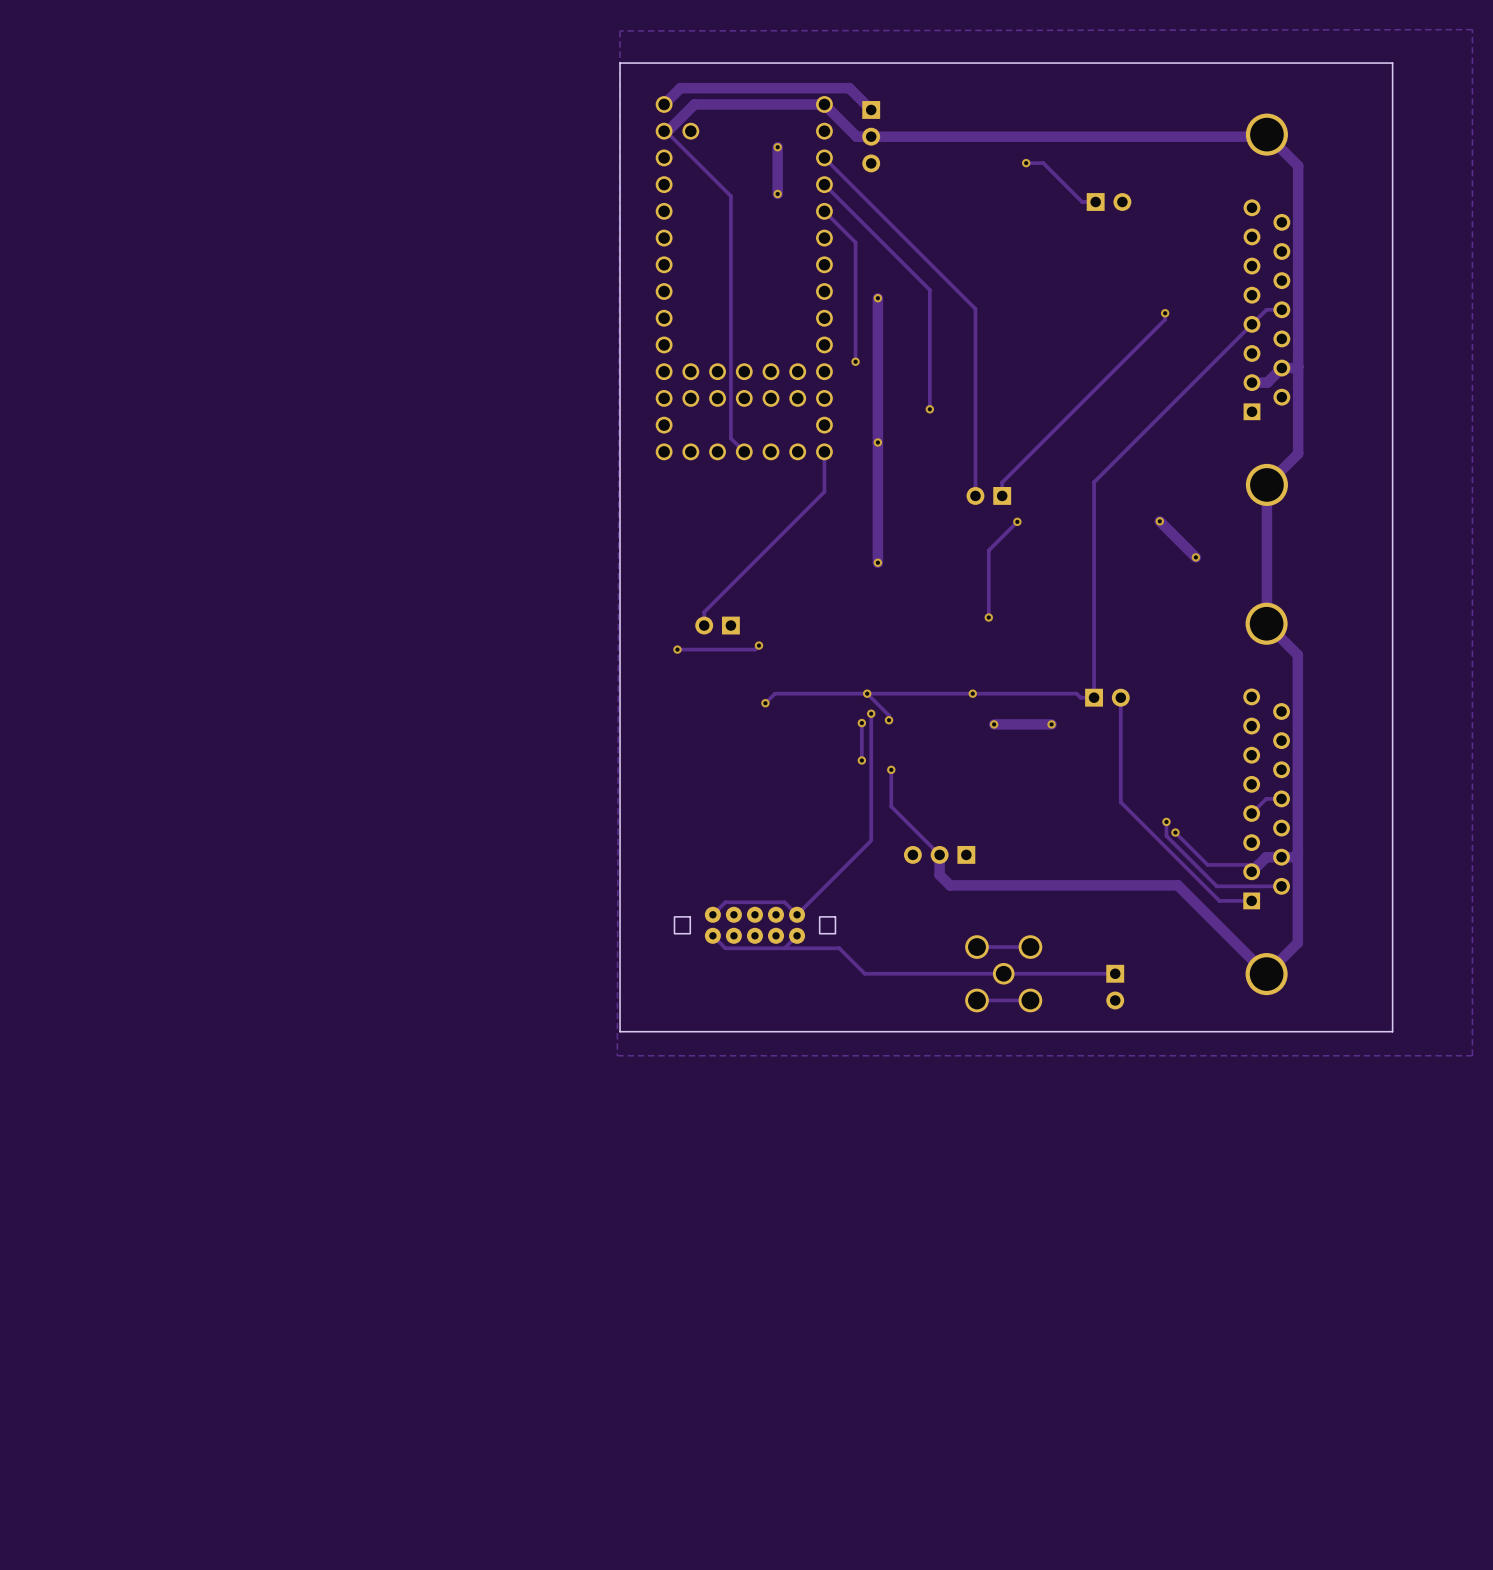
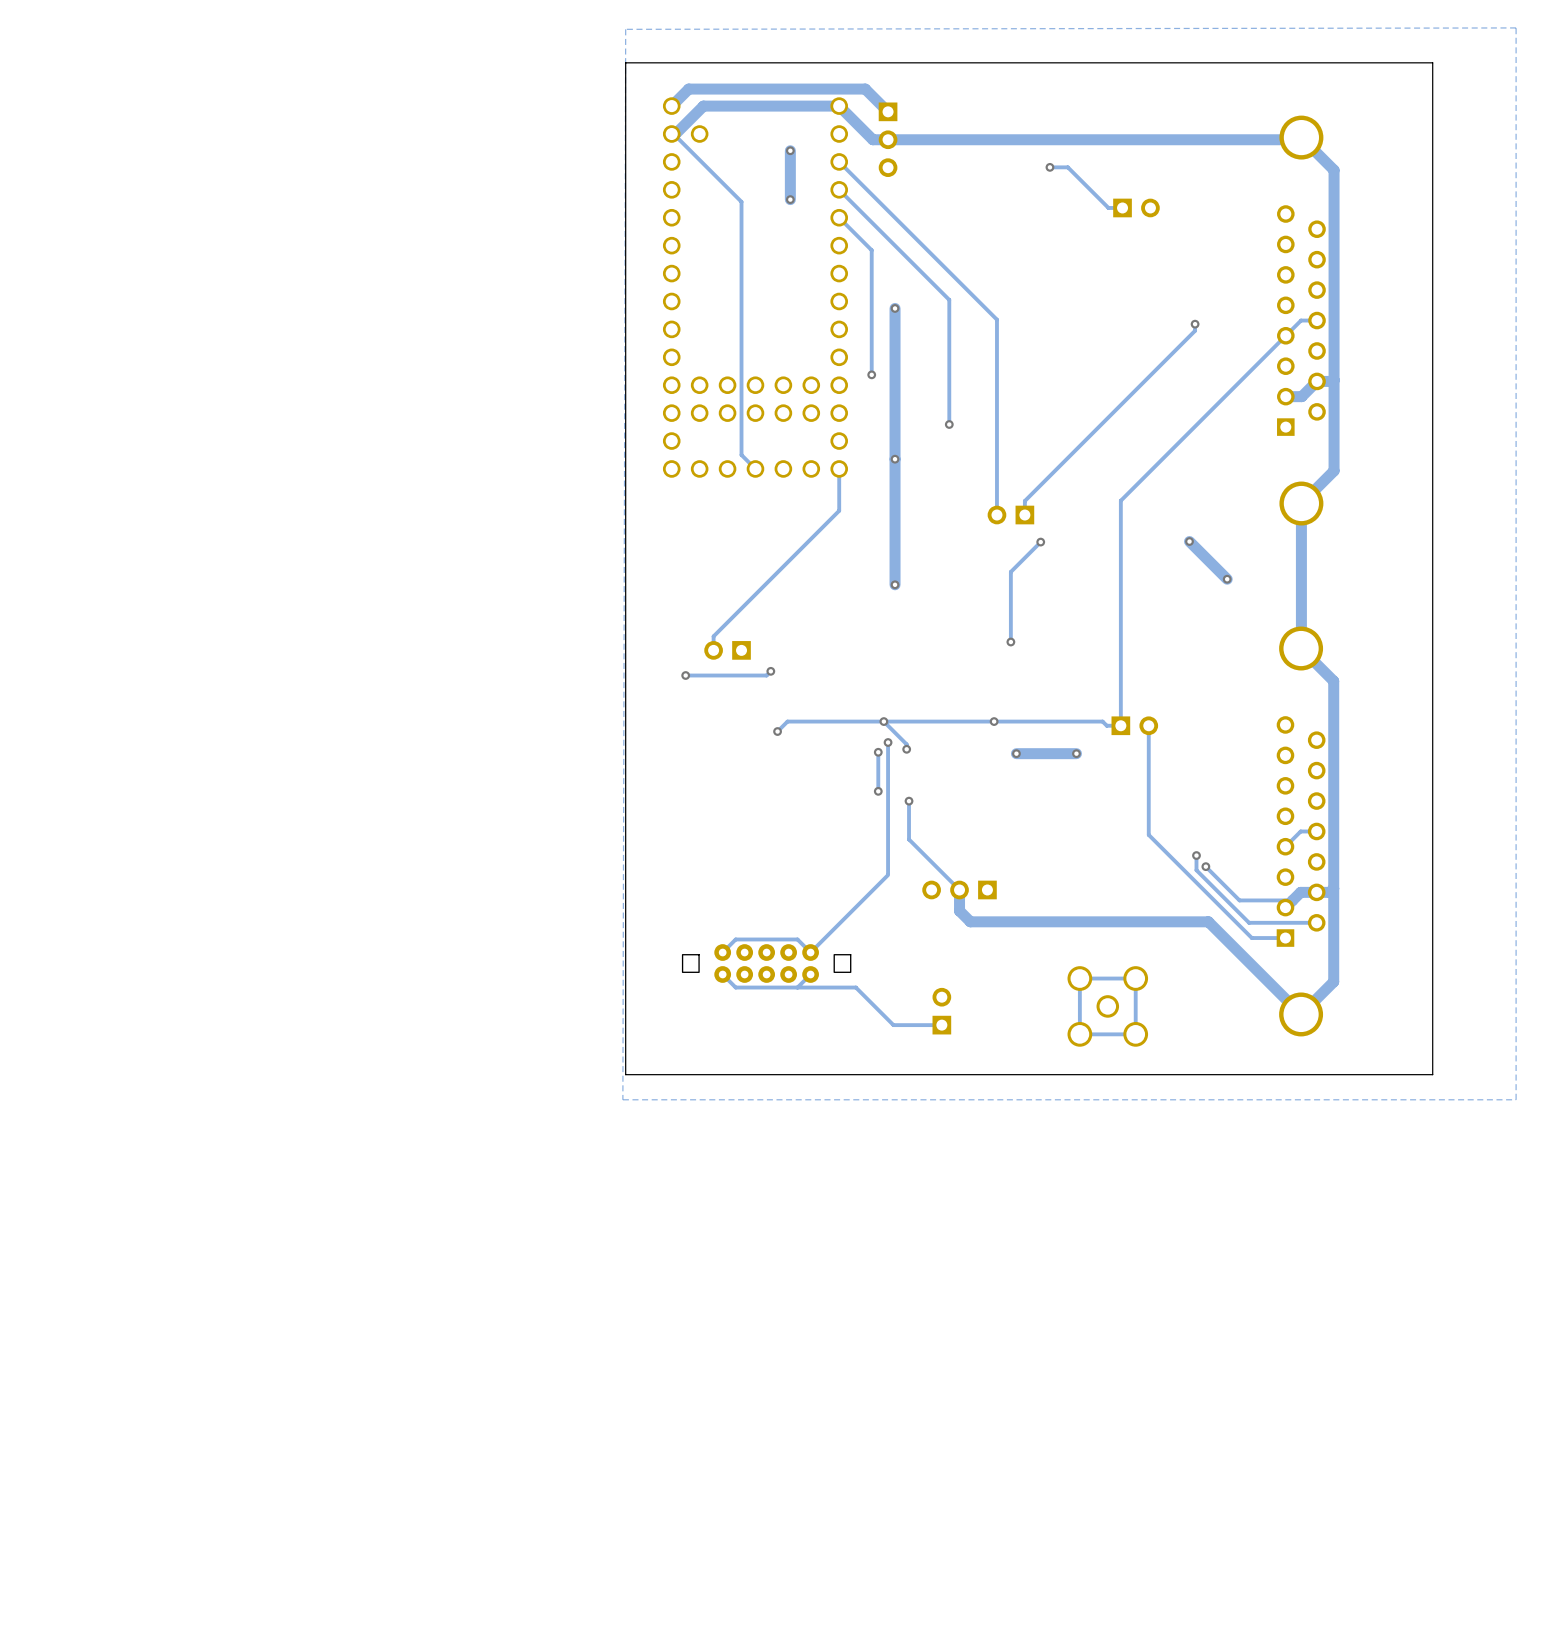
track: none -> (1135, 978) (1135, 1034) (1079, 1034) (1079, 978) (1135, 978)
track: (1030, 947) (976, 947) -> none
track: (839, 948) (864, 973) -> (854, 987) (893, 1025) (941, 1025)
part position: (1003, 973) -> (1107, 1006)
track: (1115, 973) (864, 973) -> none
part rotation: 0° (1115, 987) -> 180° (941, 1011)
part position: (1115, 987) -> (941, 1011)
track: (1030, 1000) (976, 1000) -> none

